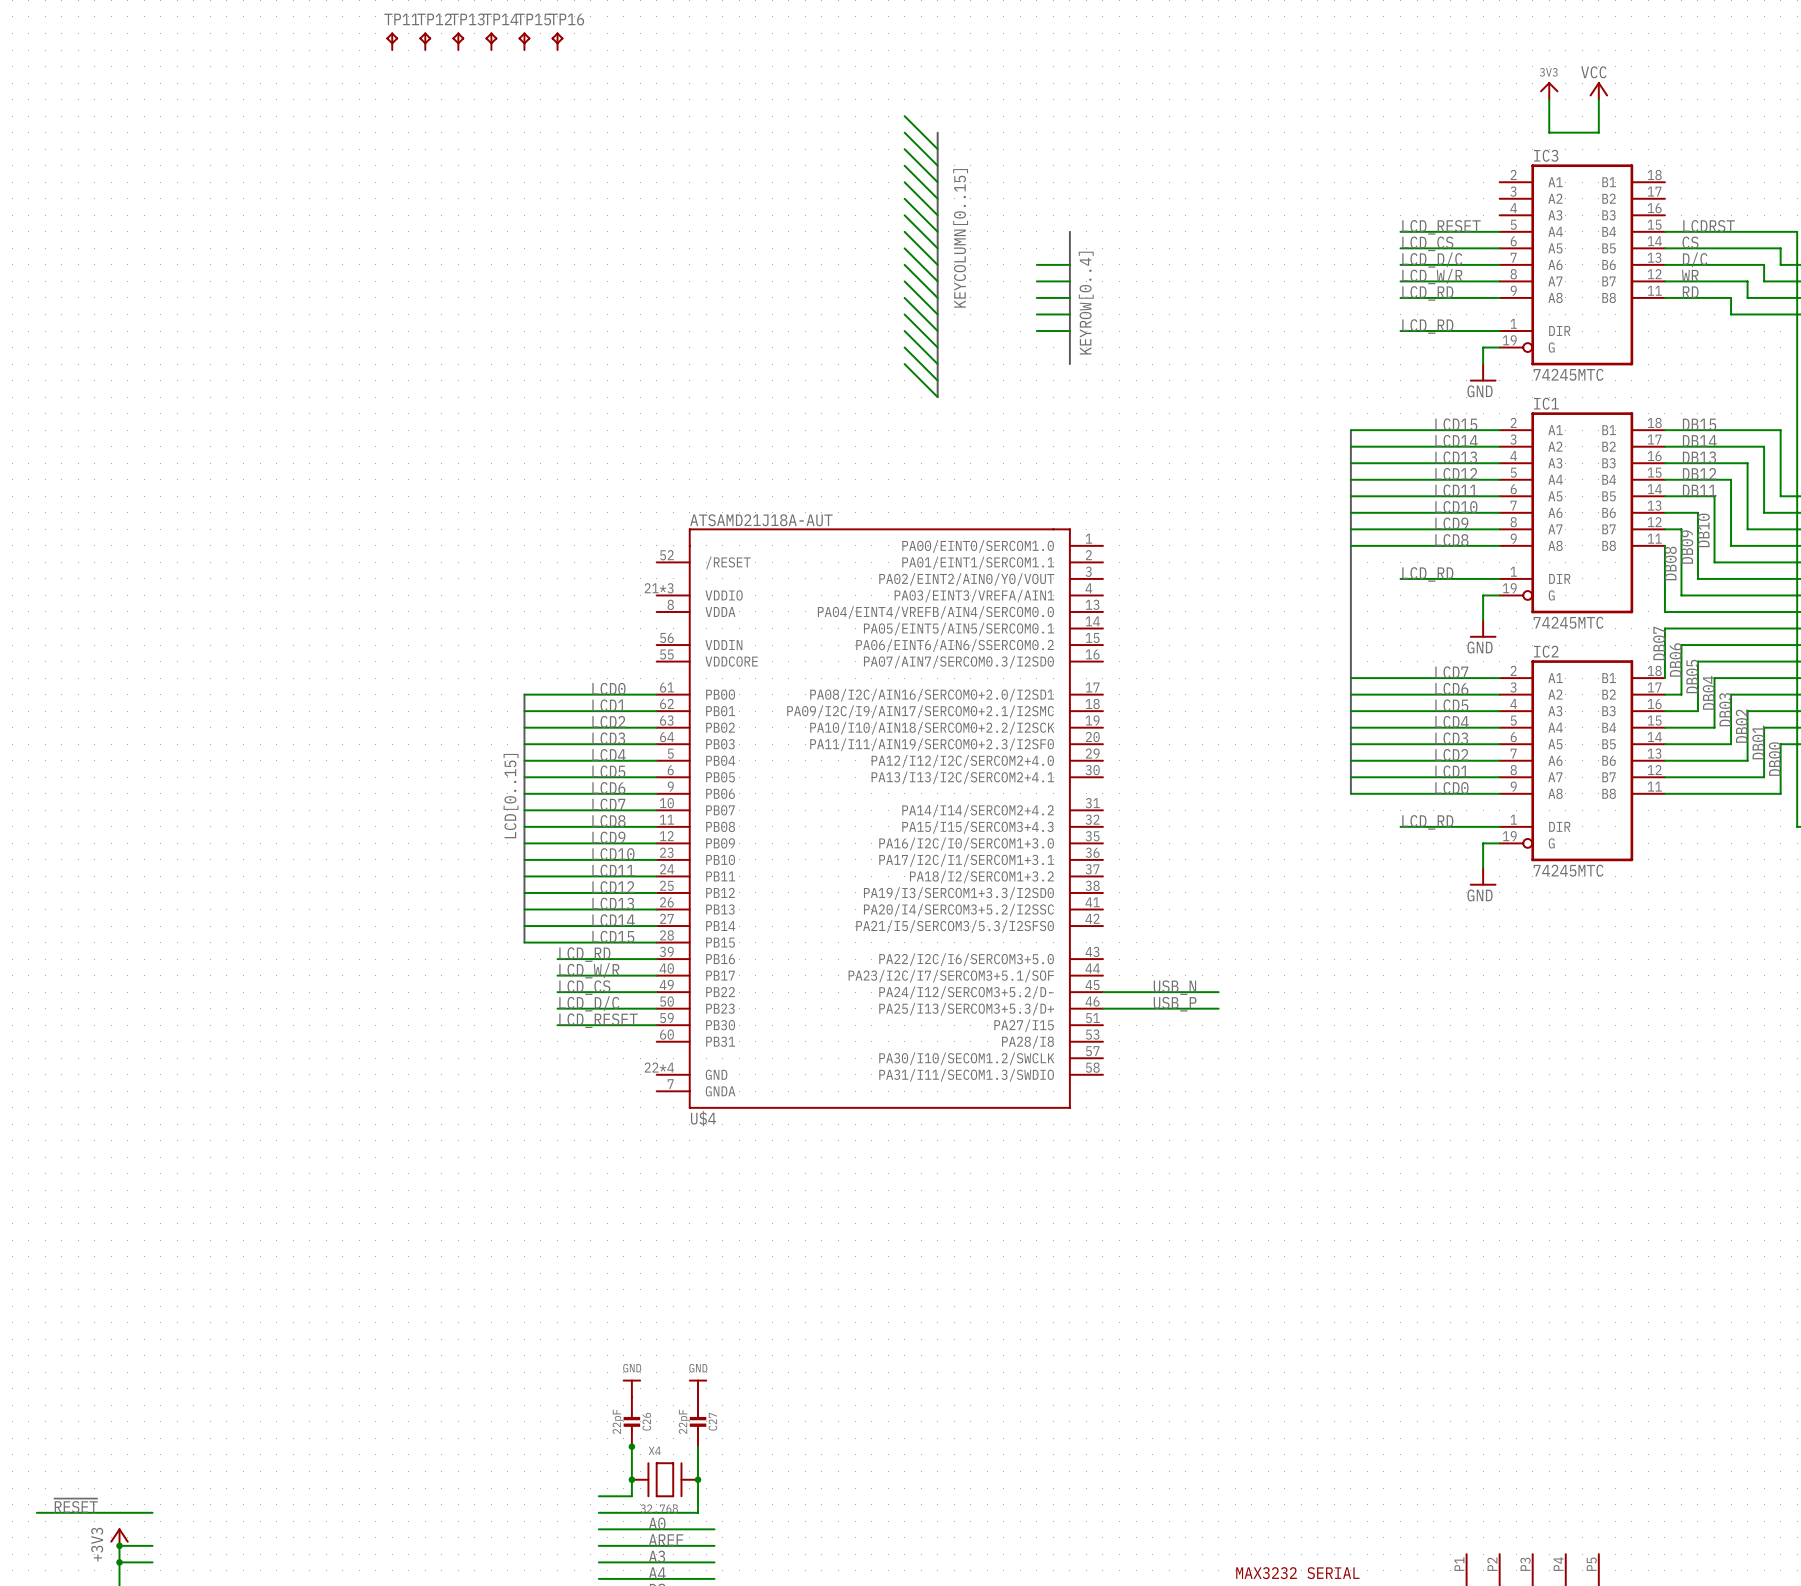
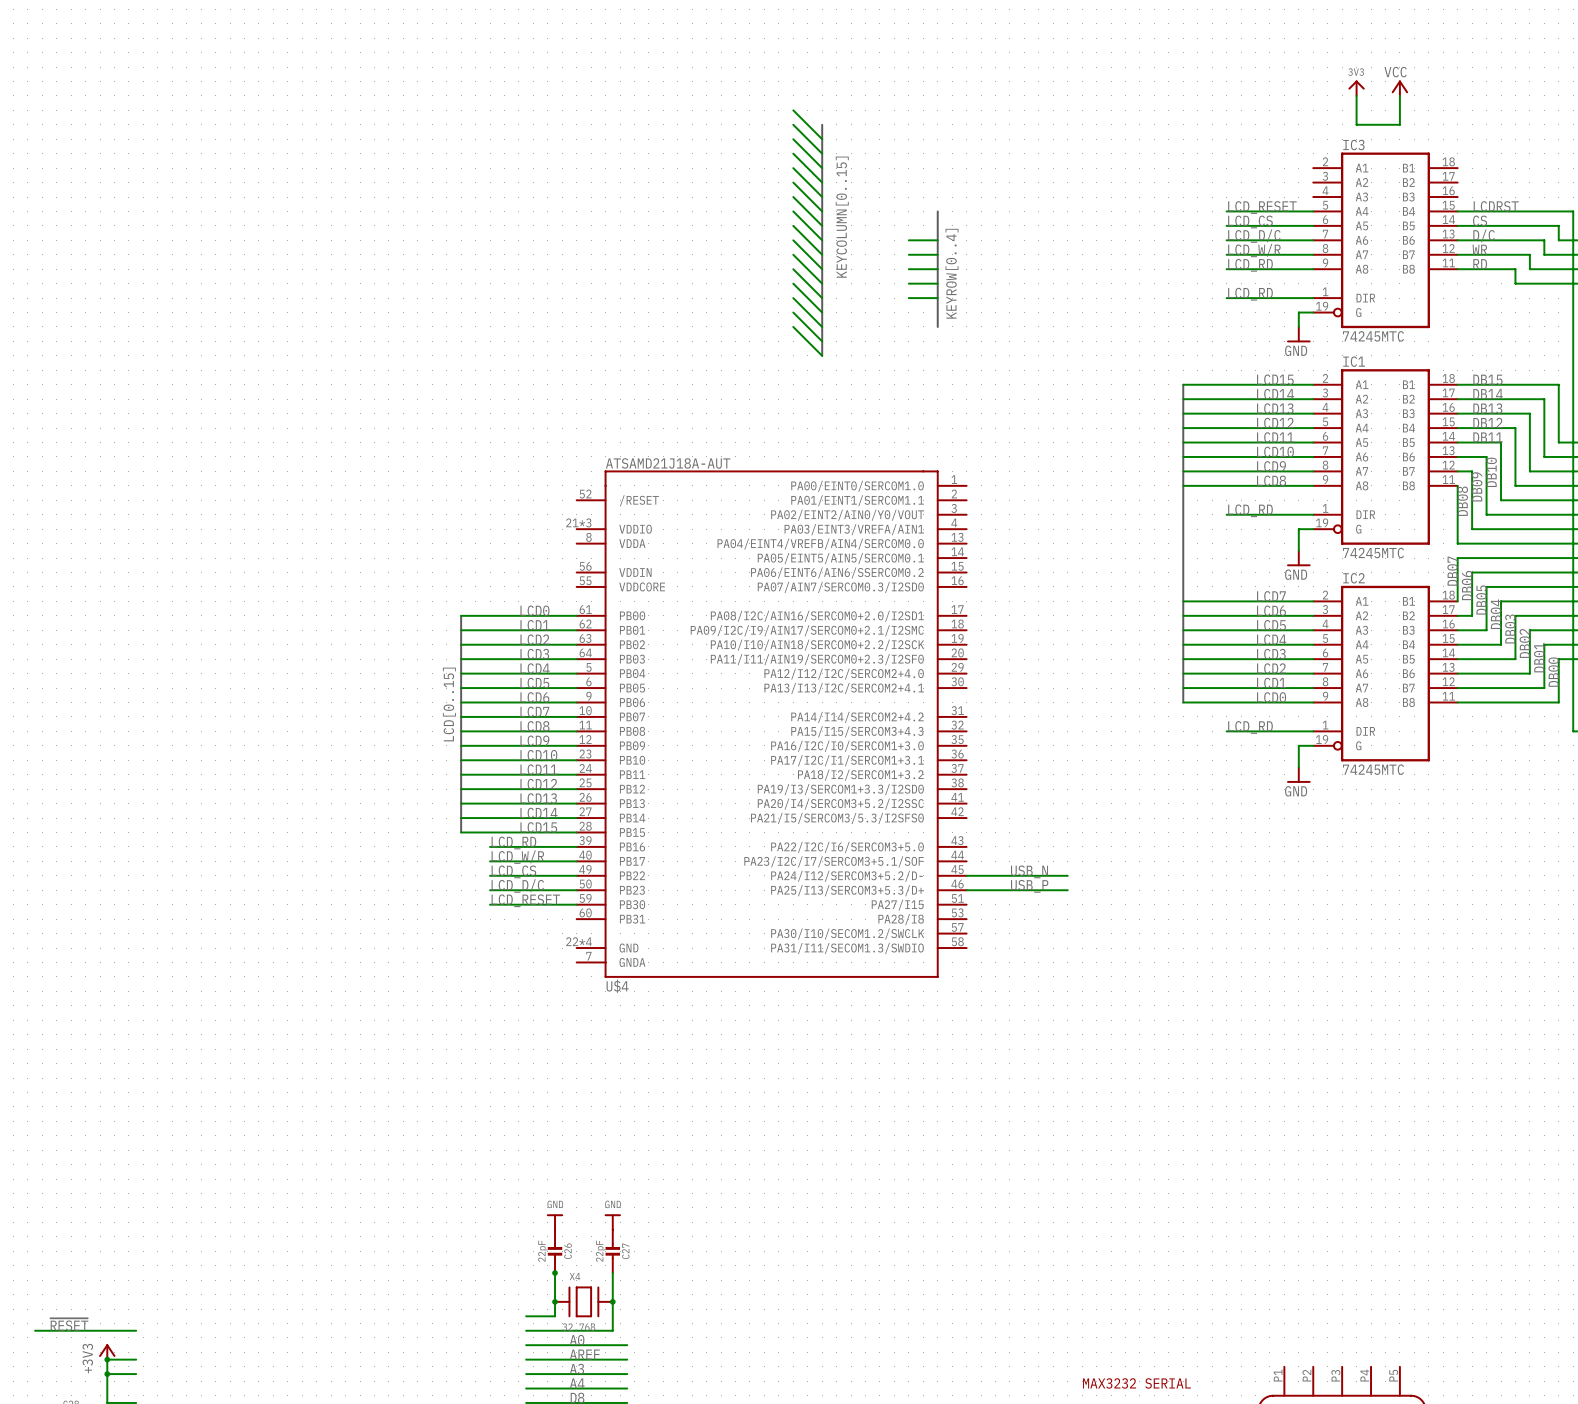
TP11: (392, 41) -> none
TP12: (425, 41) -> none
TP13: (458, 41) -> none
TP14: (491, 41) -> none
TP15: (524, 41) -> none
TP16: (557, 41) -> none

